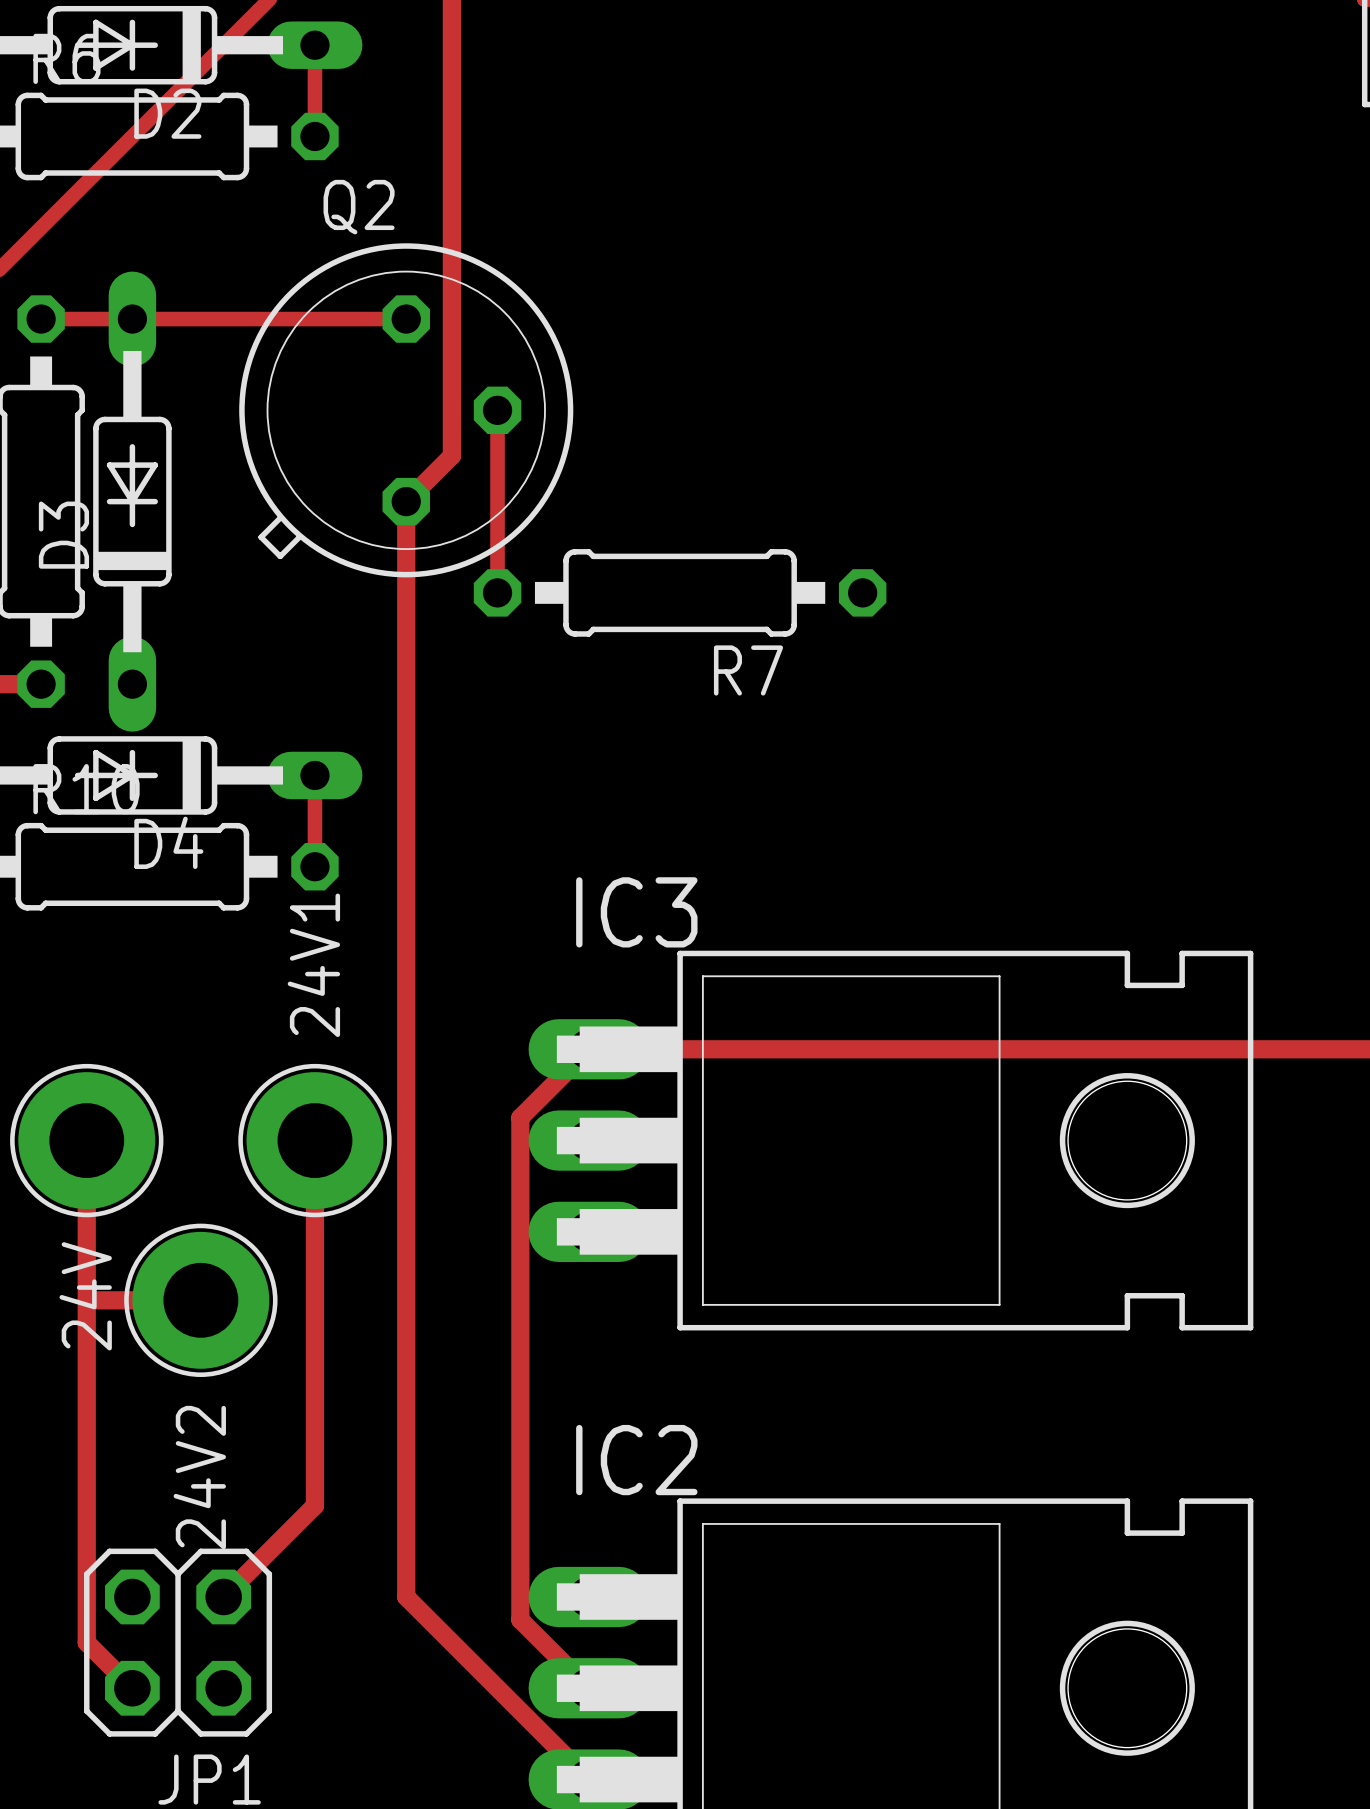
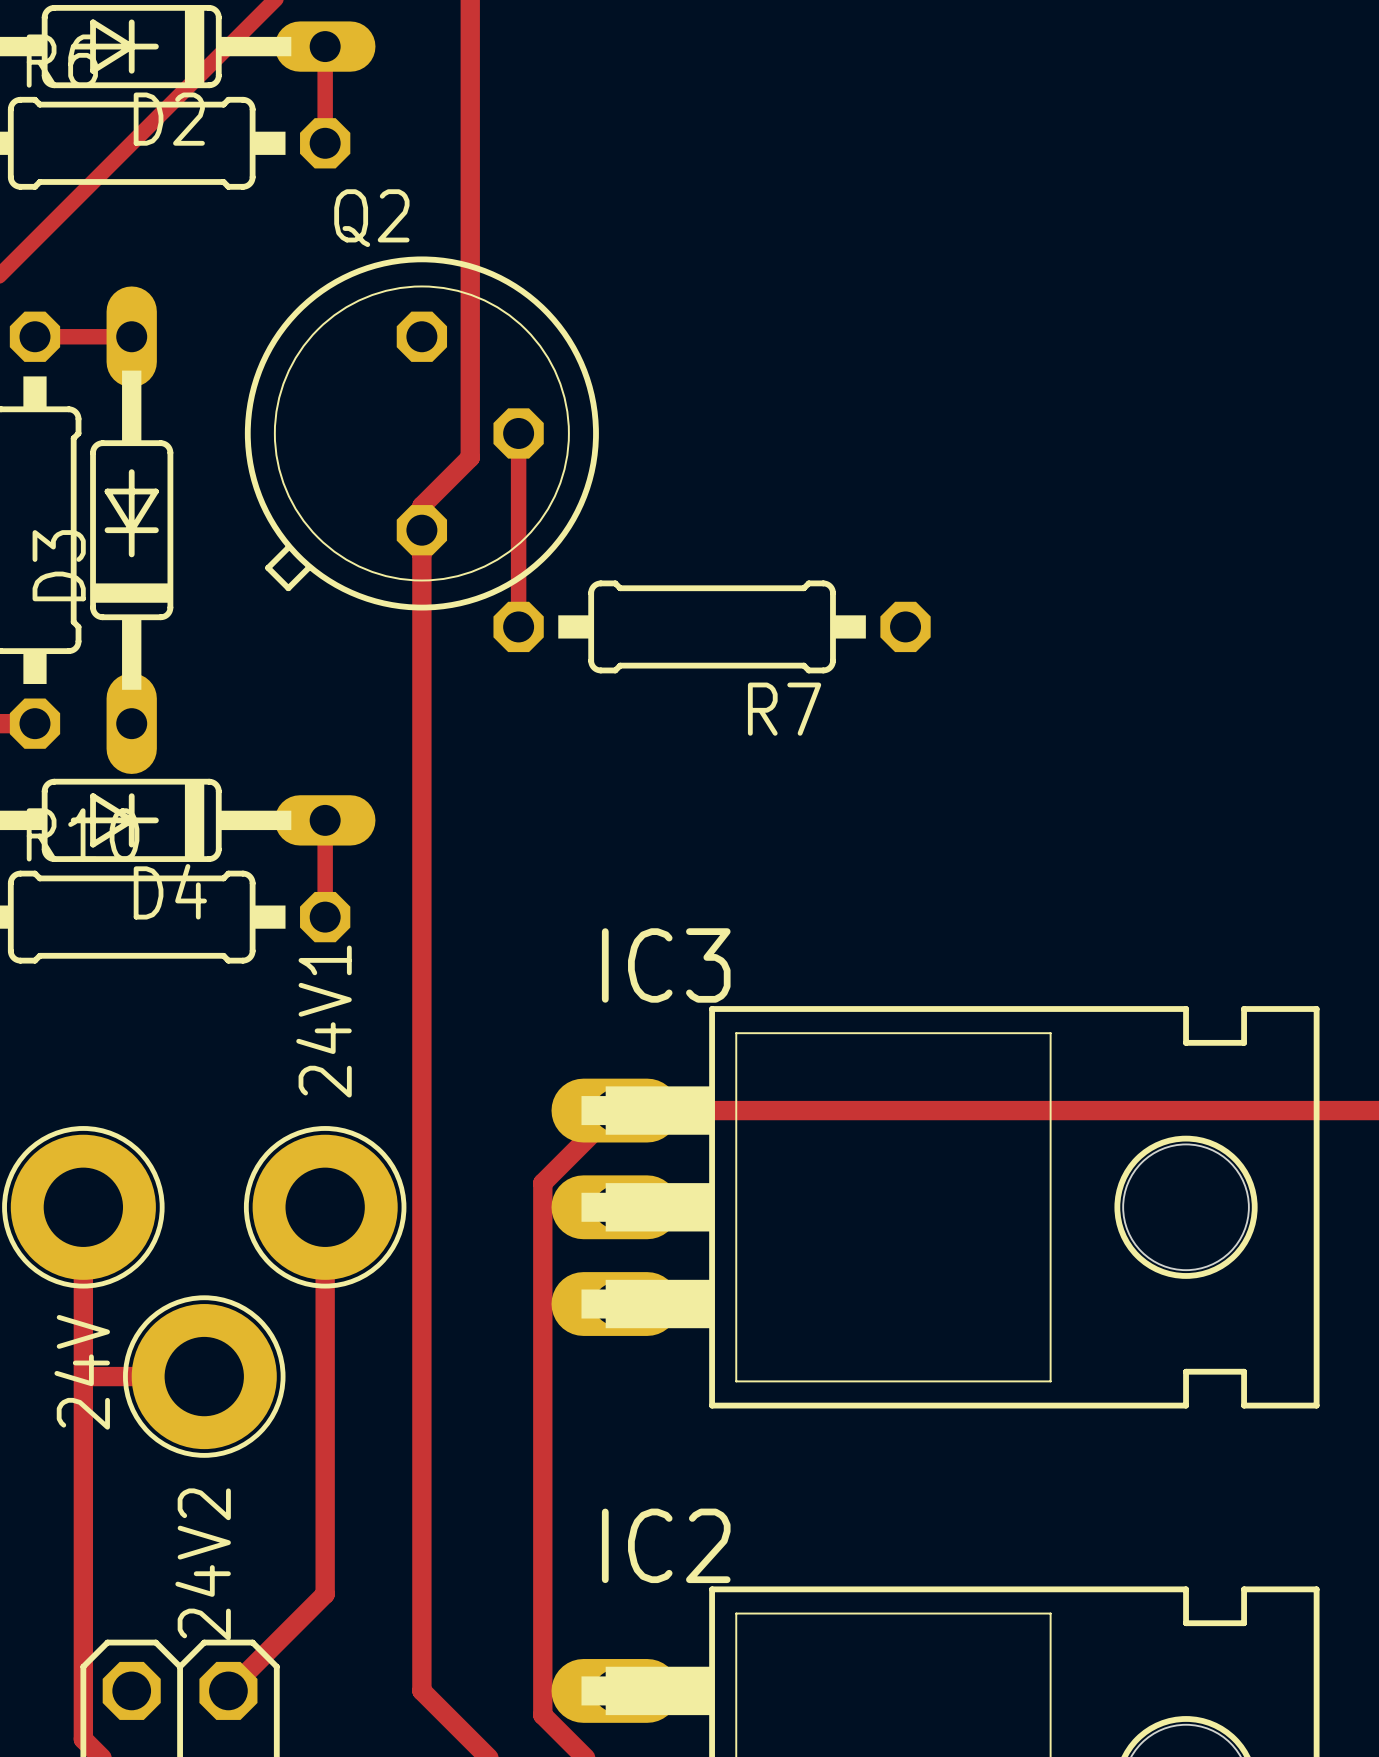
track: (132, 319) (406, 319) -> none
track: (451, 433) (451, 455) (406, 501) -> (470, 457) (421, 506) (421, 530)

